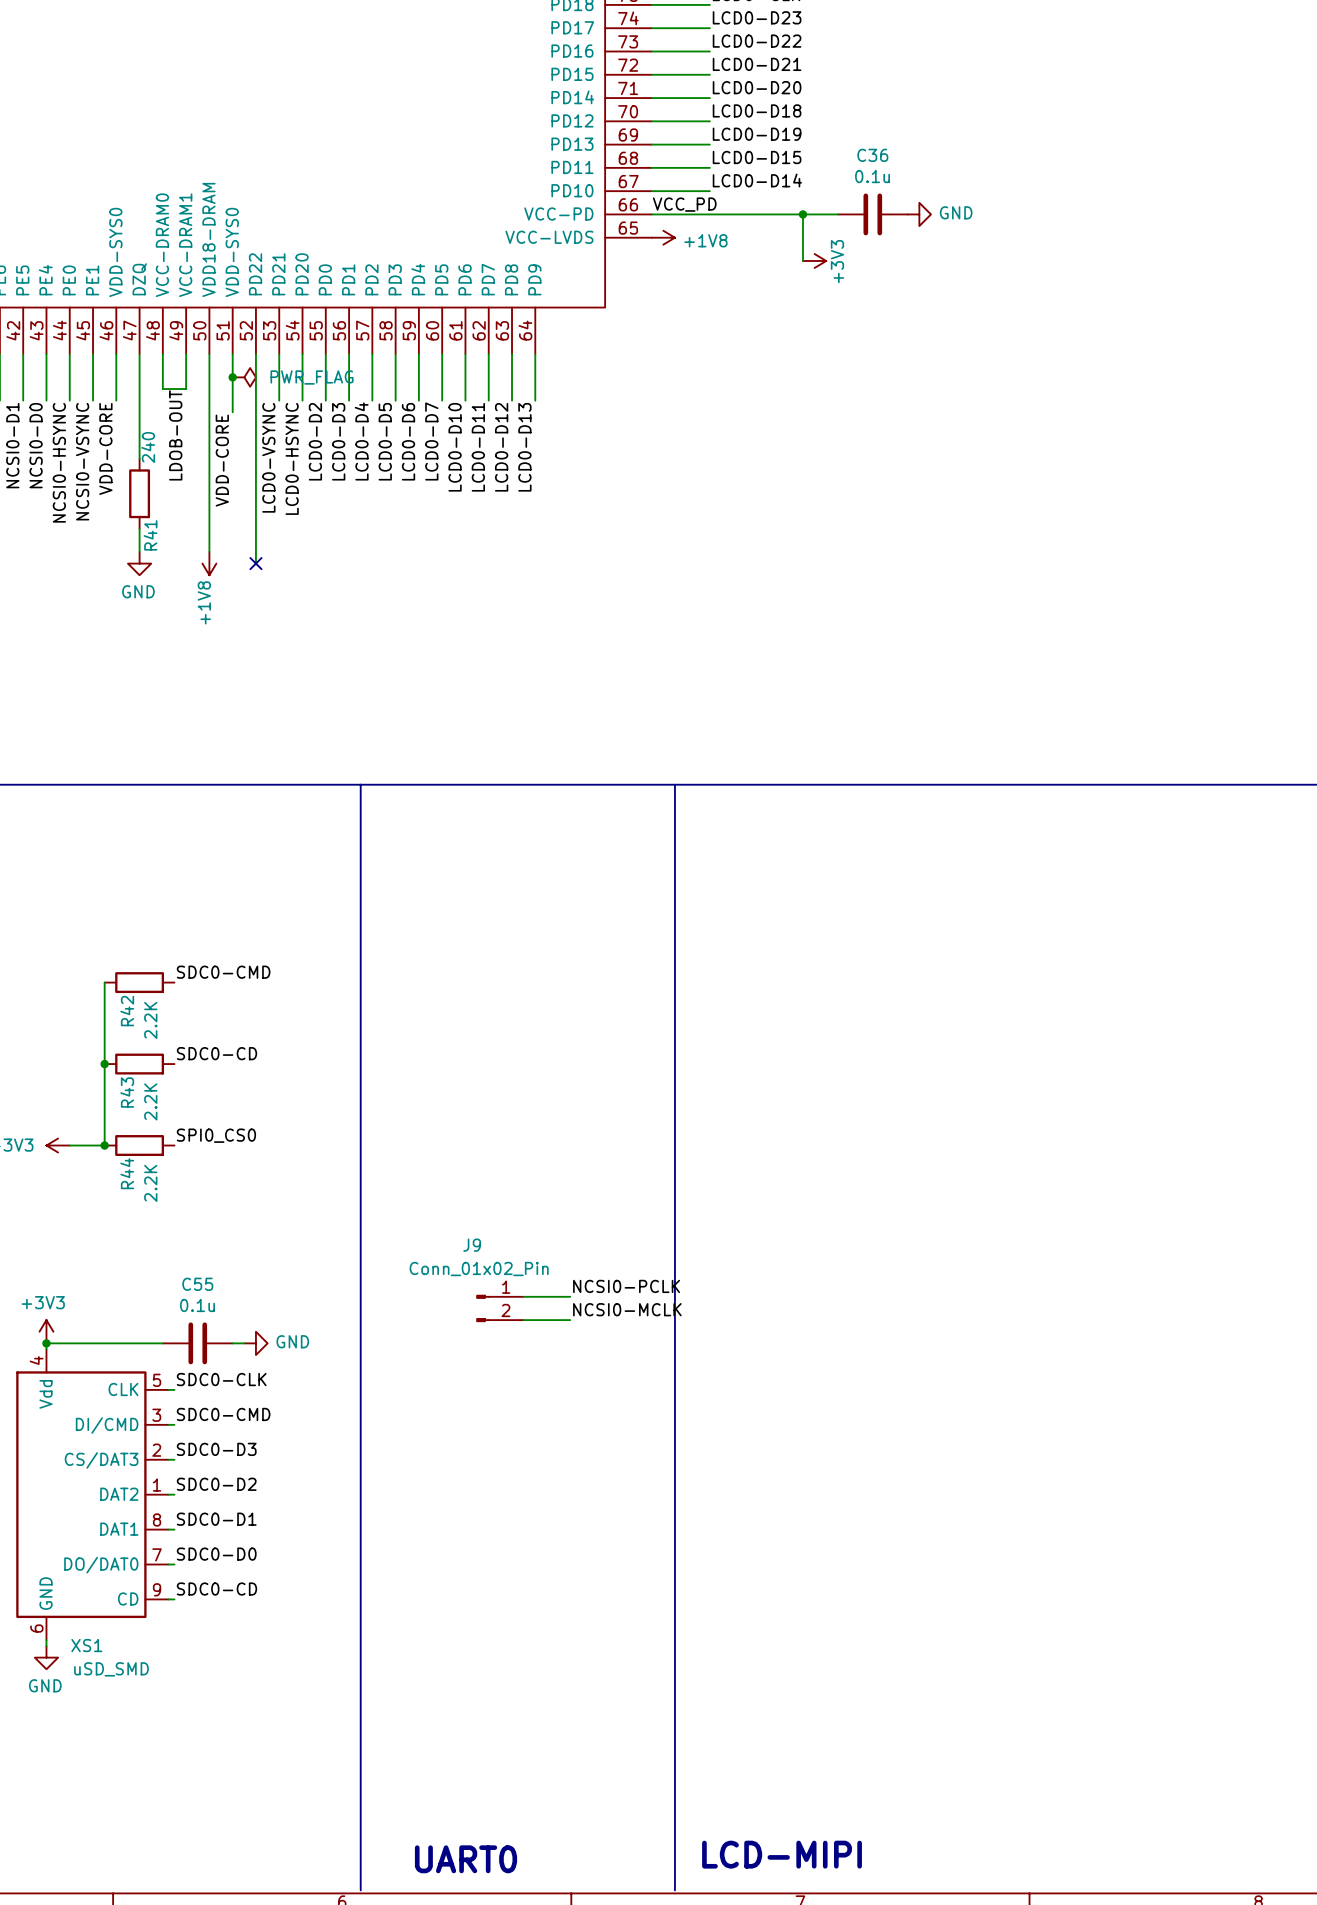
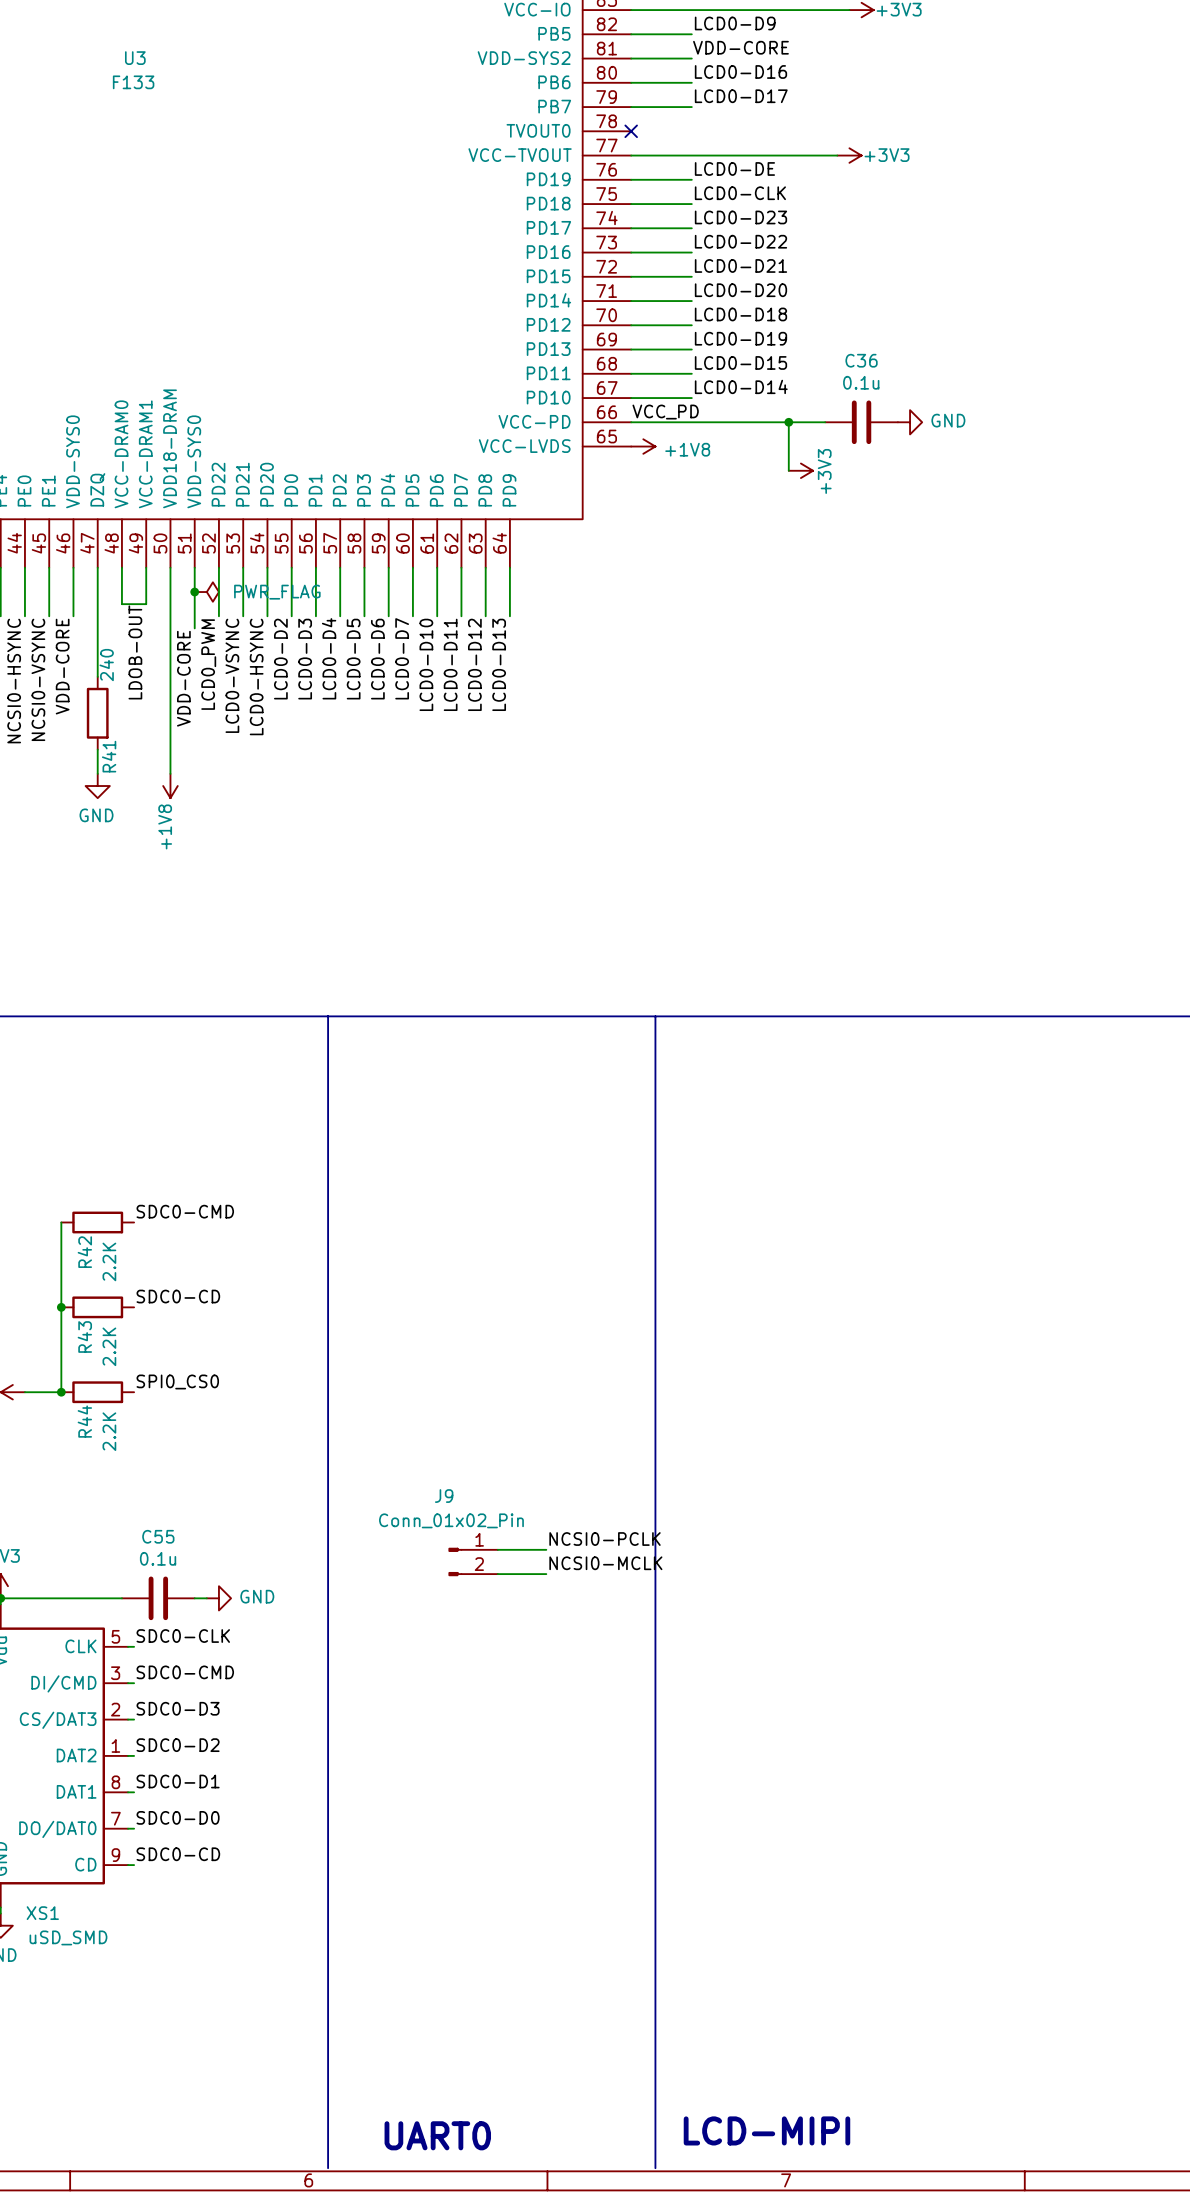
wire: (255, 400) (255, 563) -> none
label: none -> LCD0_PWM (208, 664)
no-connect mark: (255, 563) -> none

